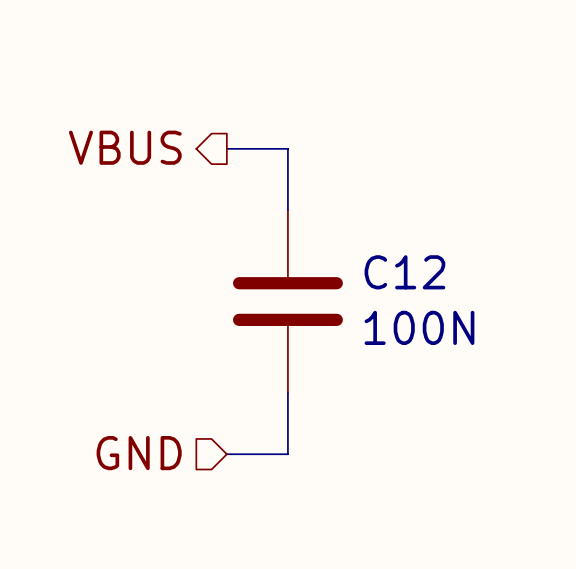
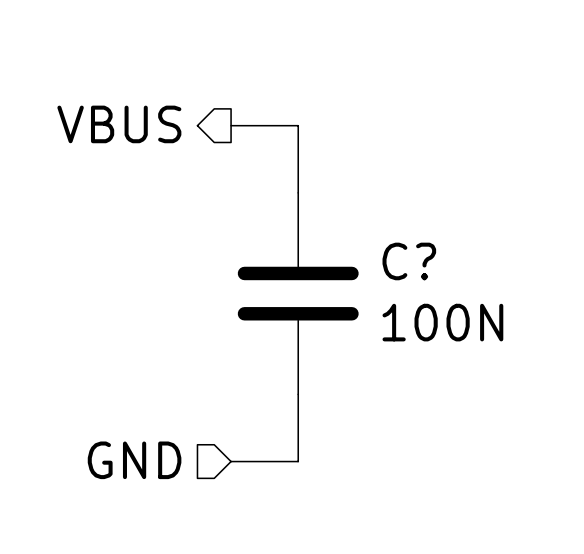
C12 name: C12 (404, 272) -> C? (409, 261)

